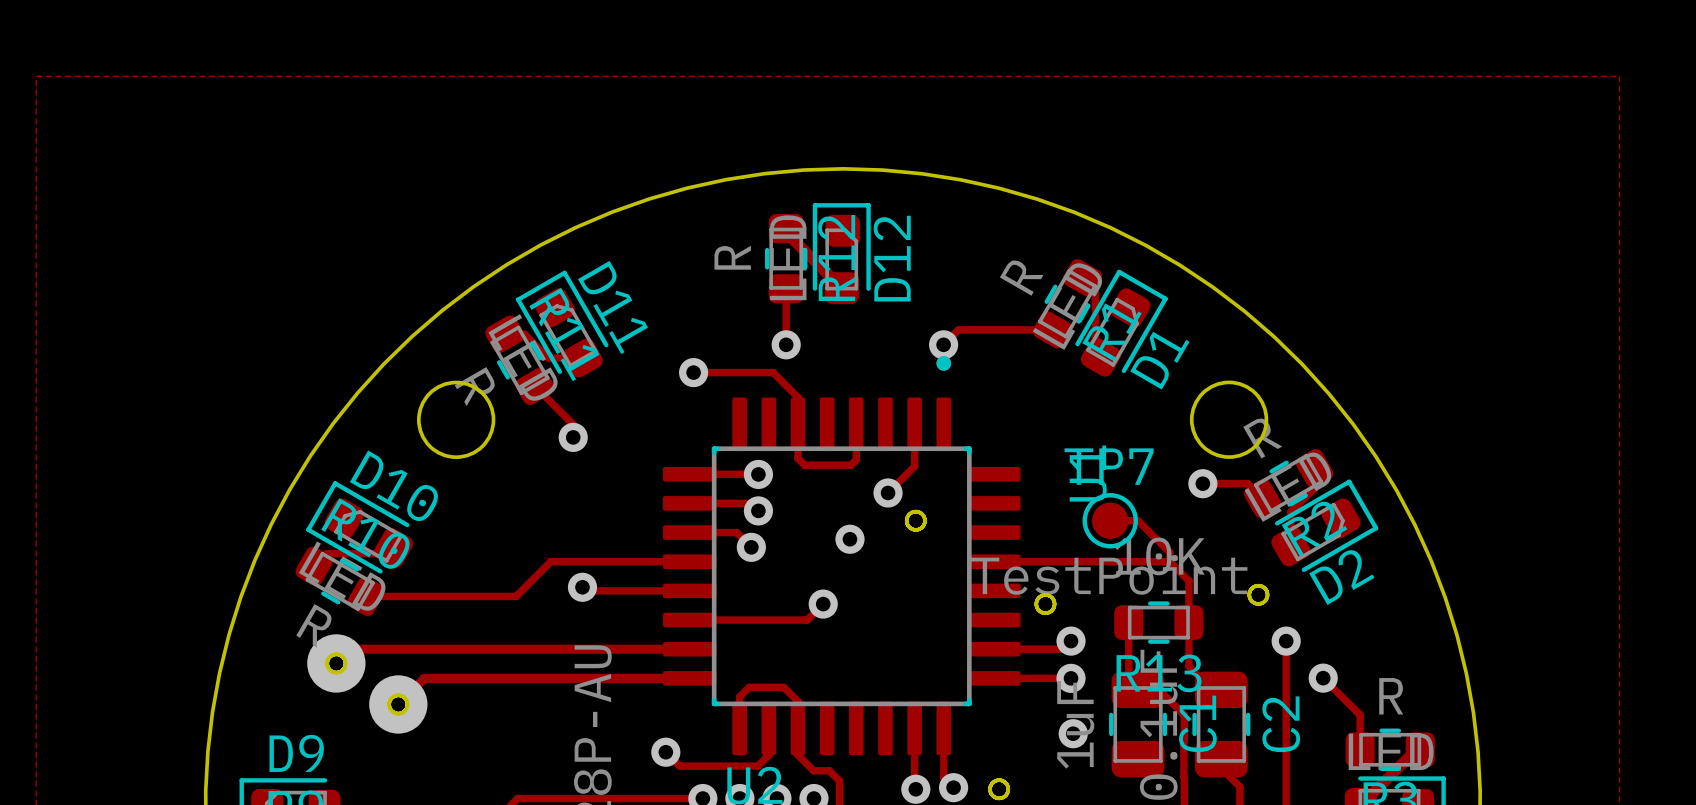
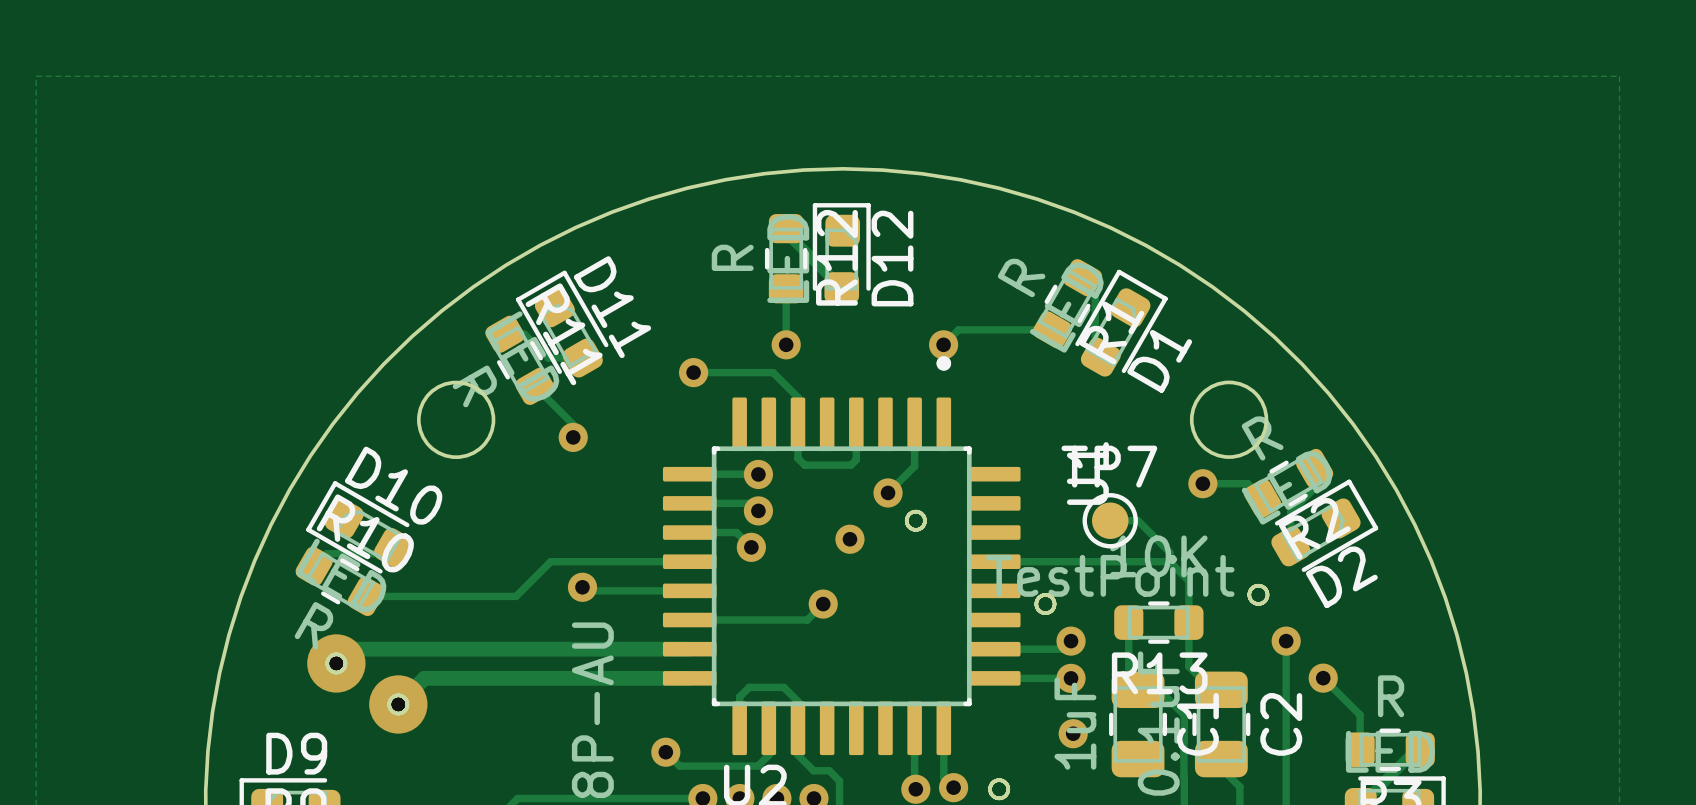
track width: thin (350, 649) (689, 649) -> thick (350, 649) (689, 649)
track width: thin (689, 678) (424, 678) (398, 704) -> thick (689, 678) (424, 678) (398, 704)

